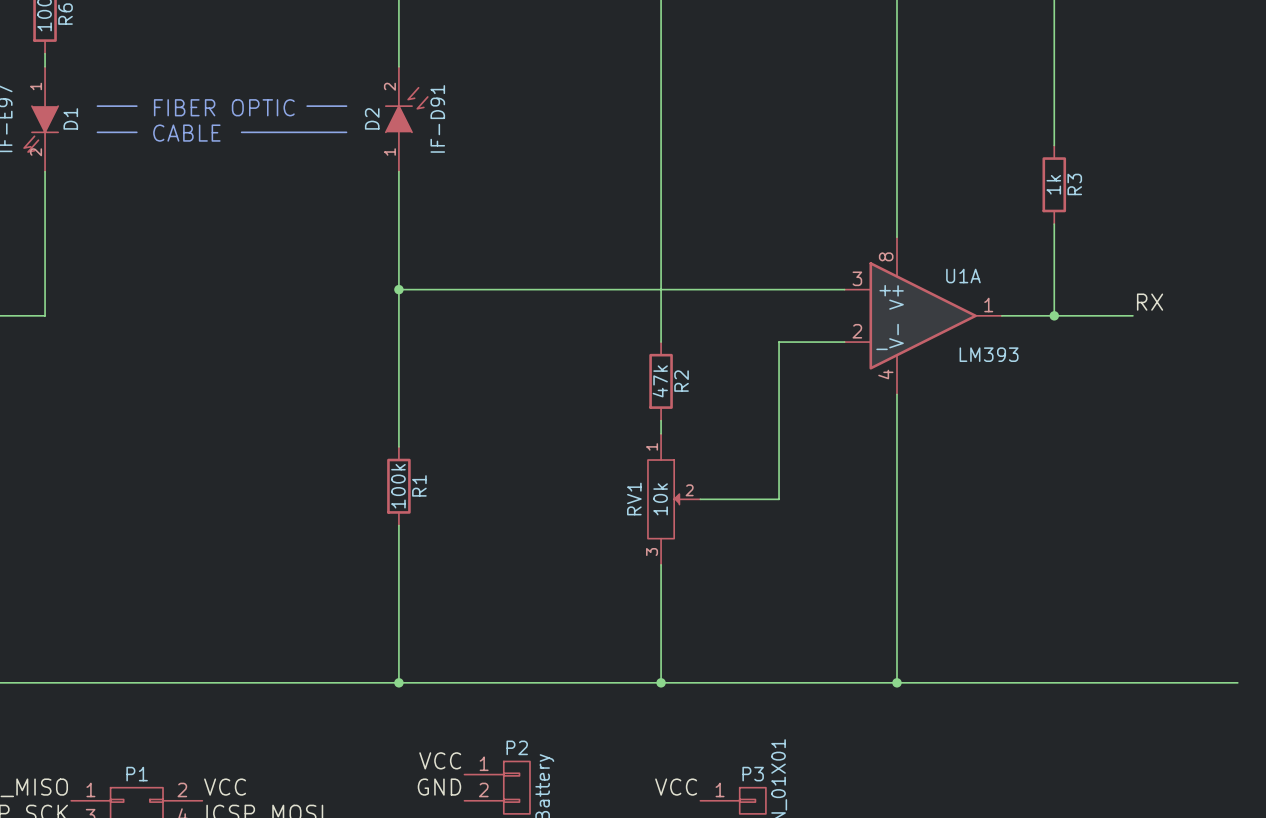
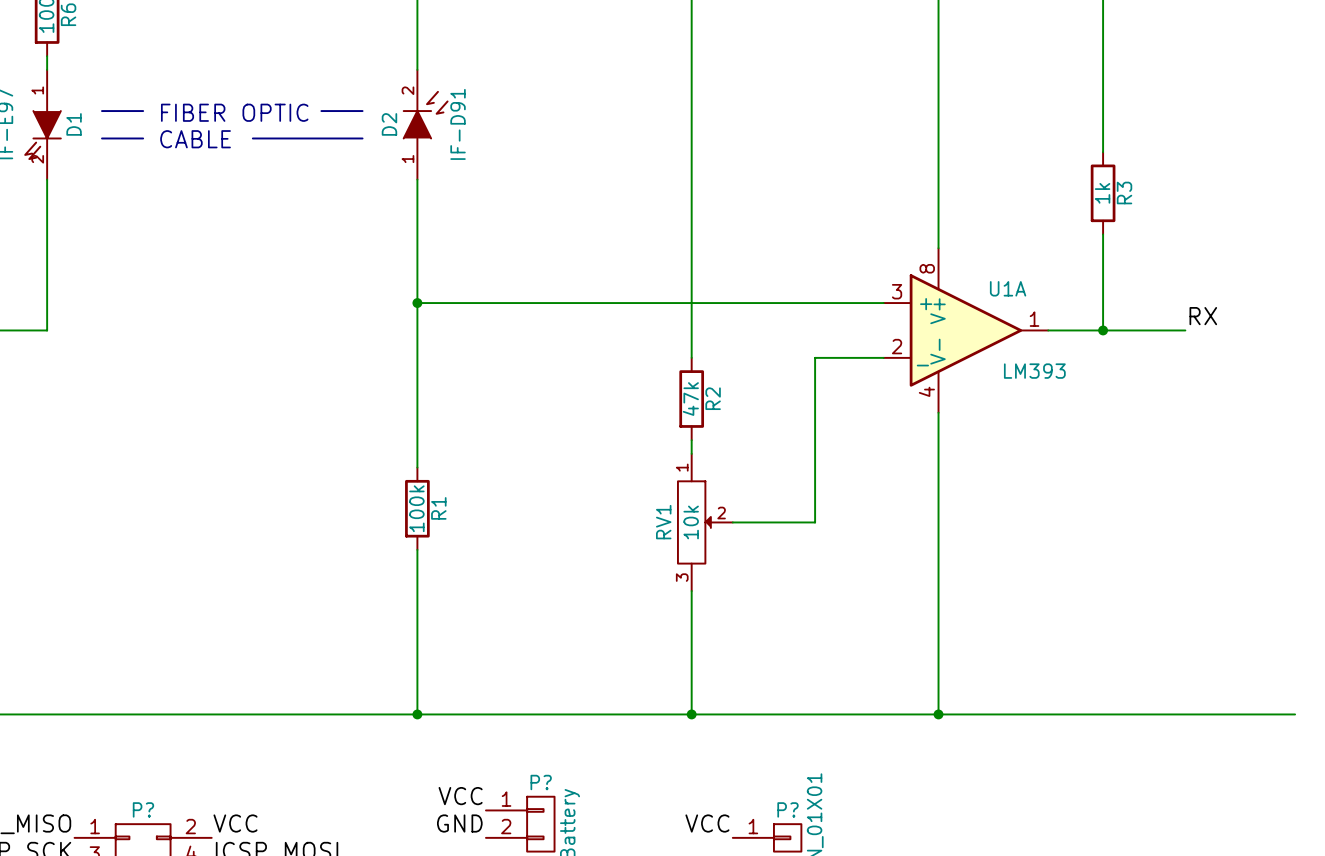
P2 name: P2 (517, 747) -> P? (541, 782)
P1 name: P1 (137, 774) -> P? (143, 809)
P3 name: P3 (753, 774) -> P? (788, 809)

